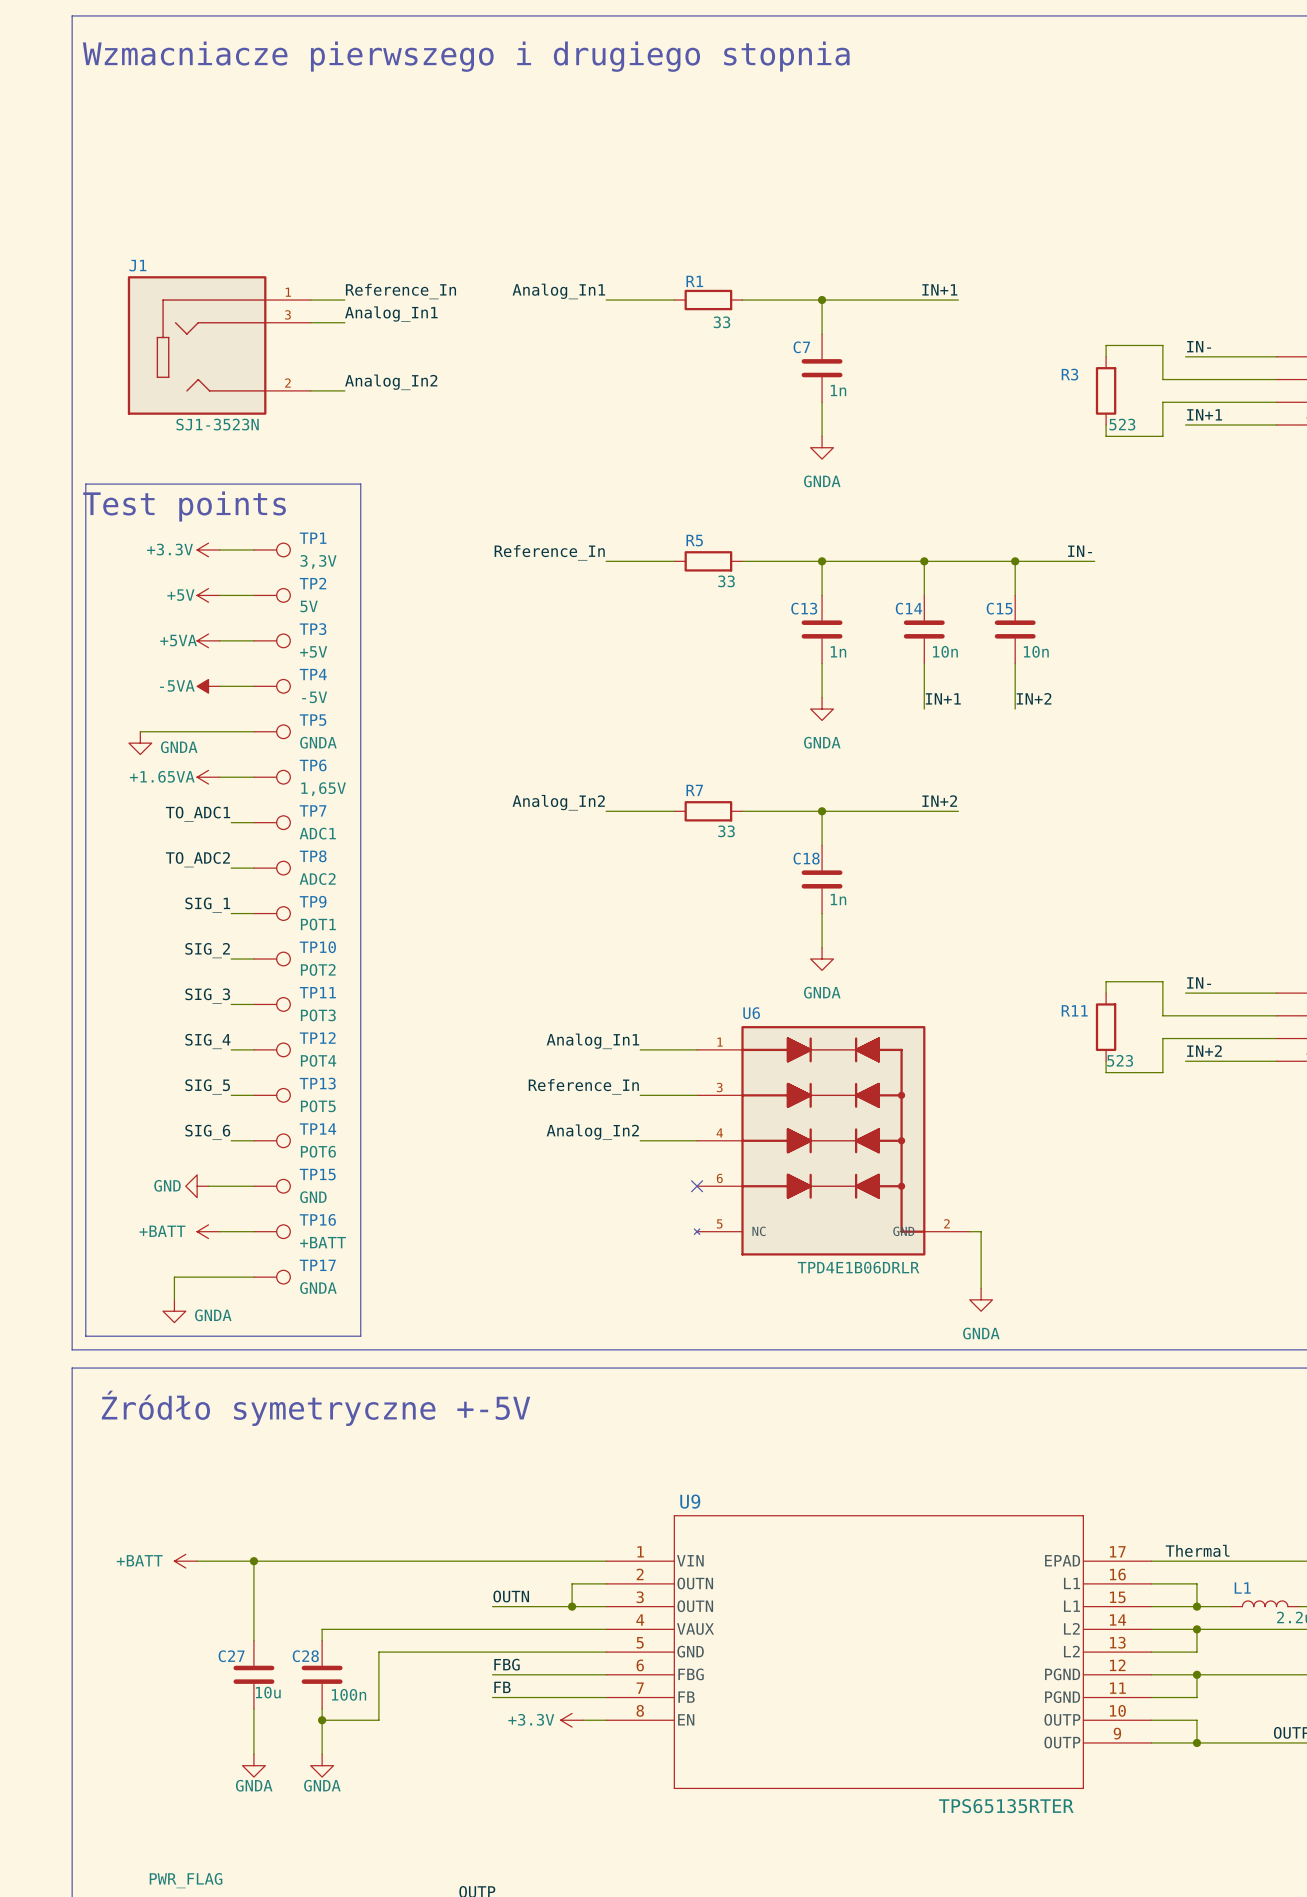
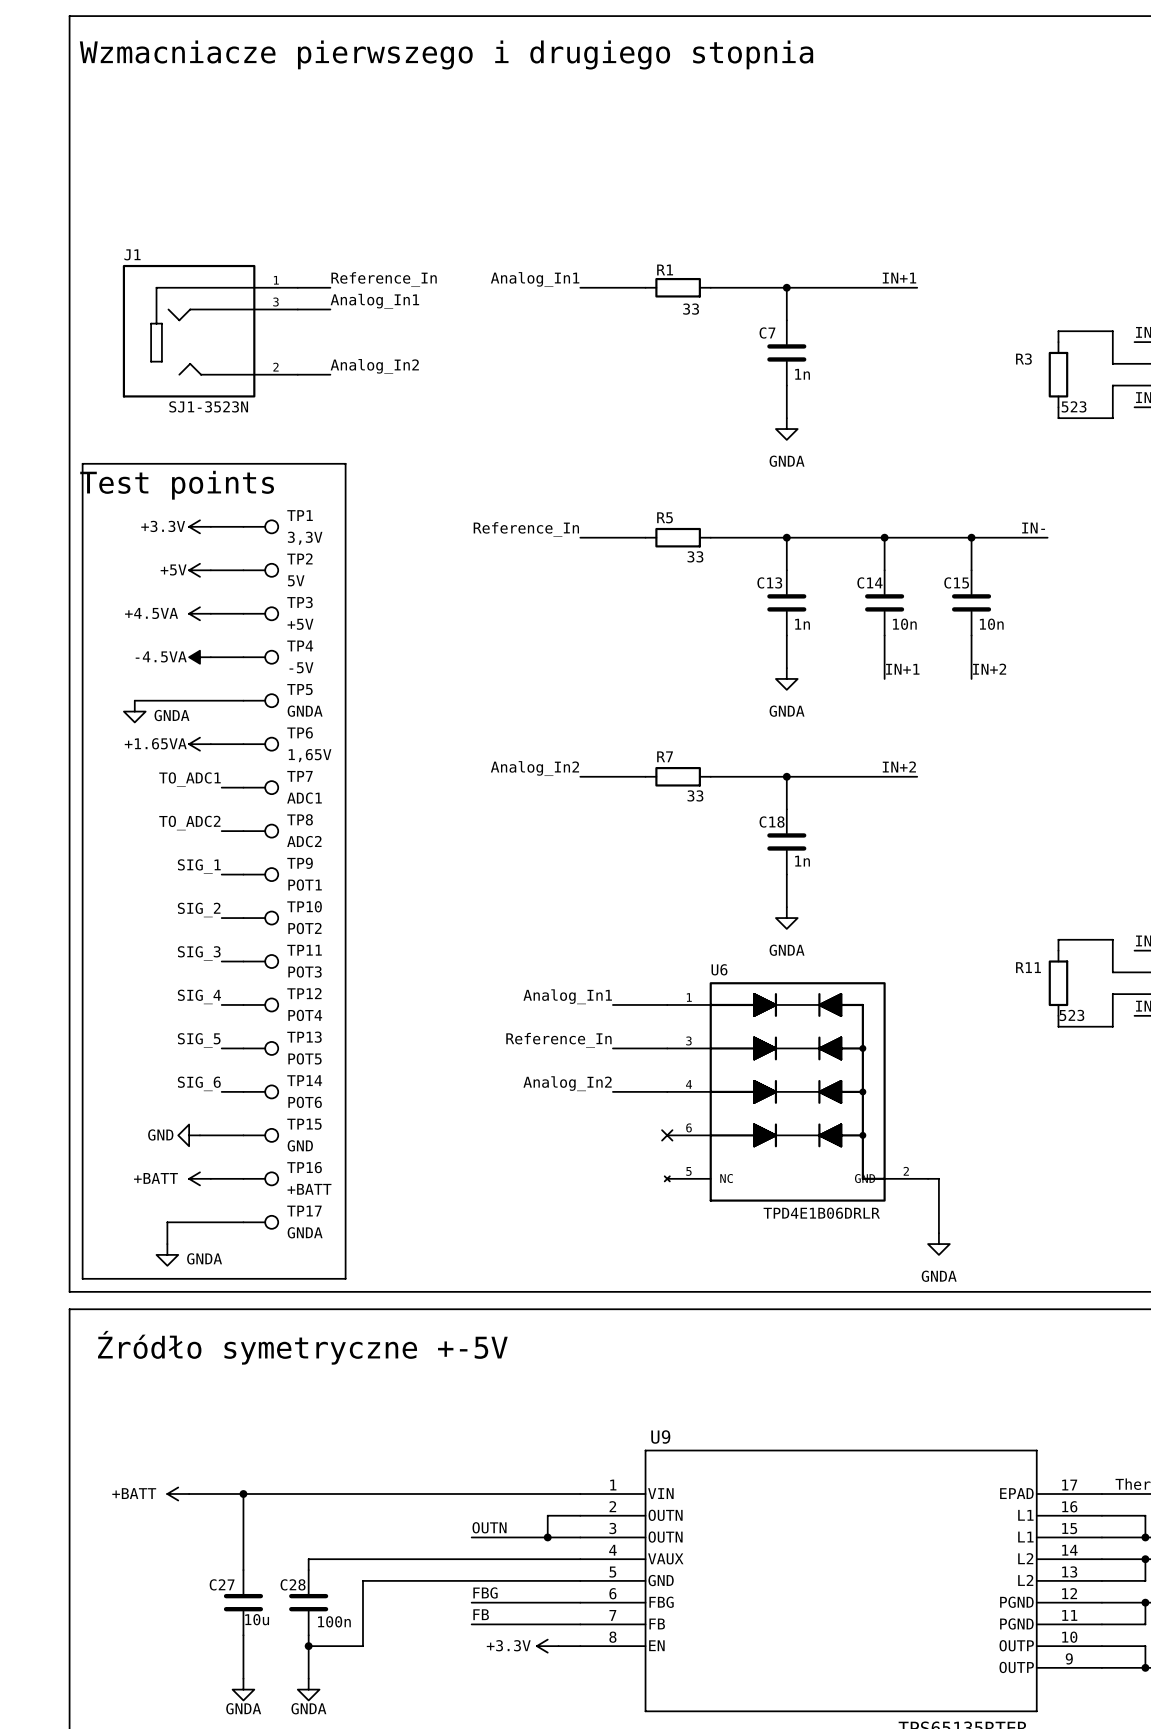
power symbol: +5VA (208, 640) -> +4.5VA (199, 613)
power symbol: -5VA (208, 686) -> -4.5VA (199, 657)

